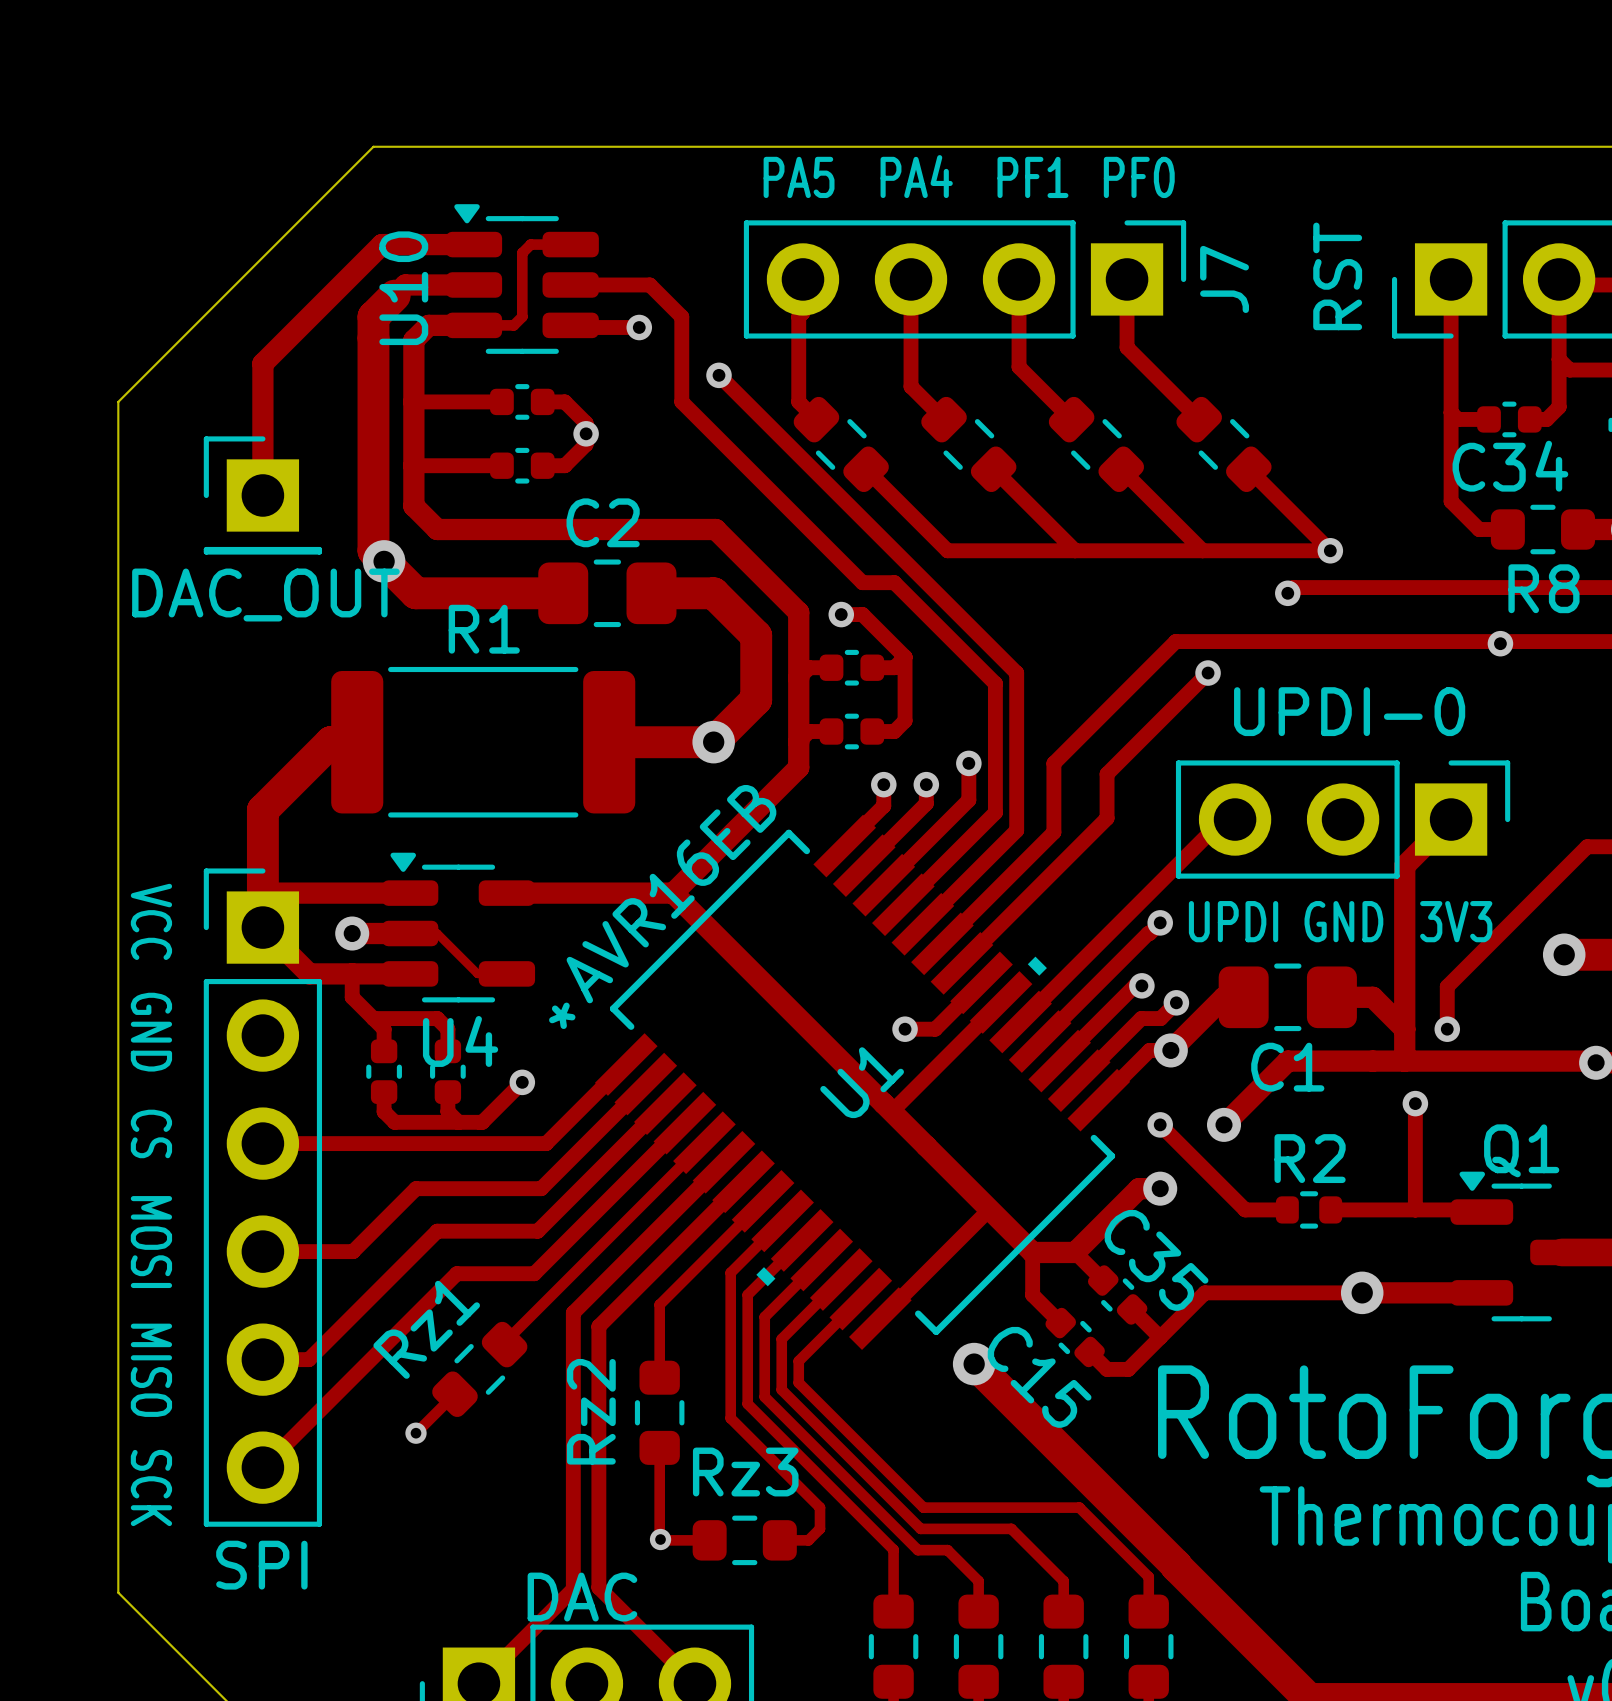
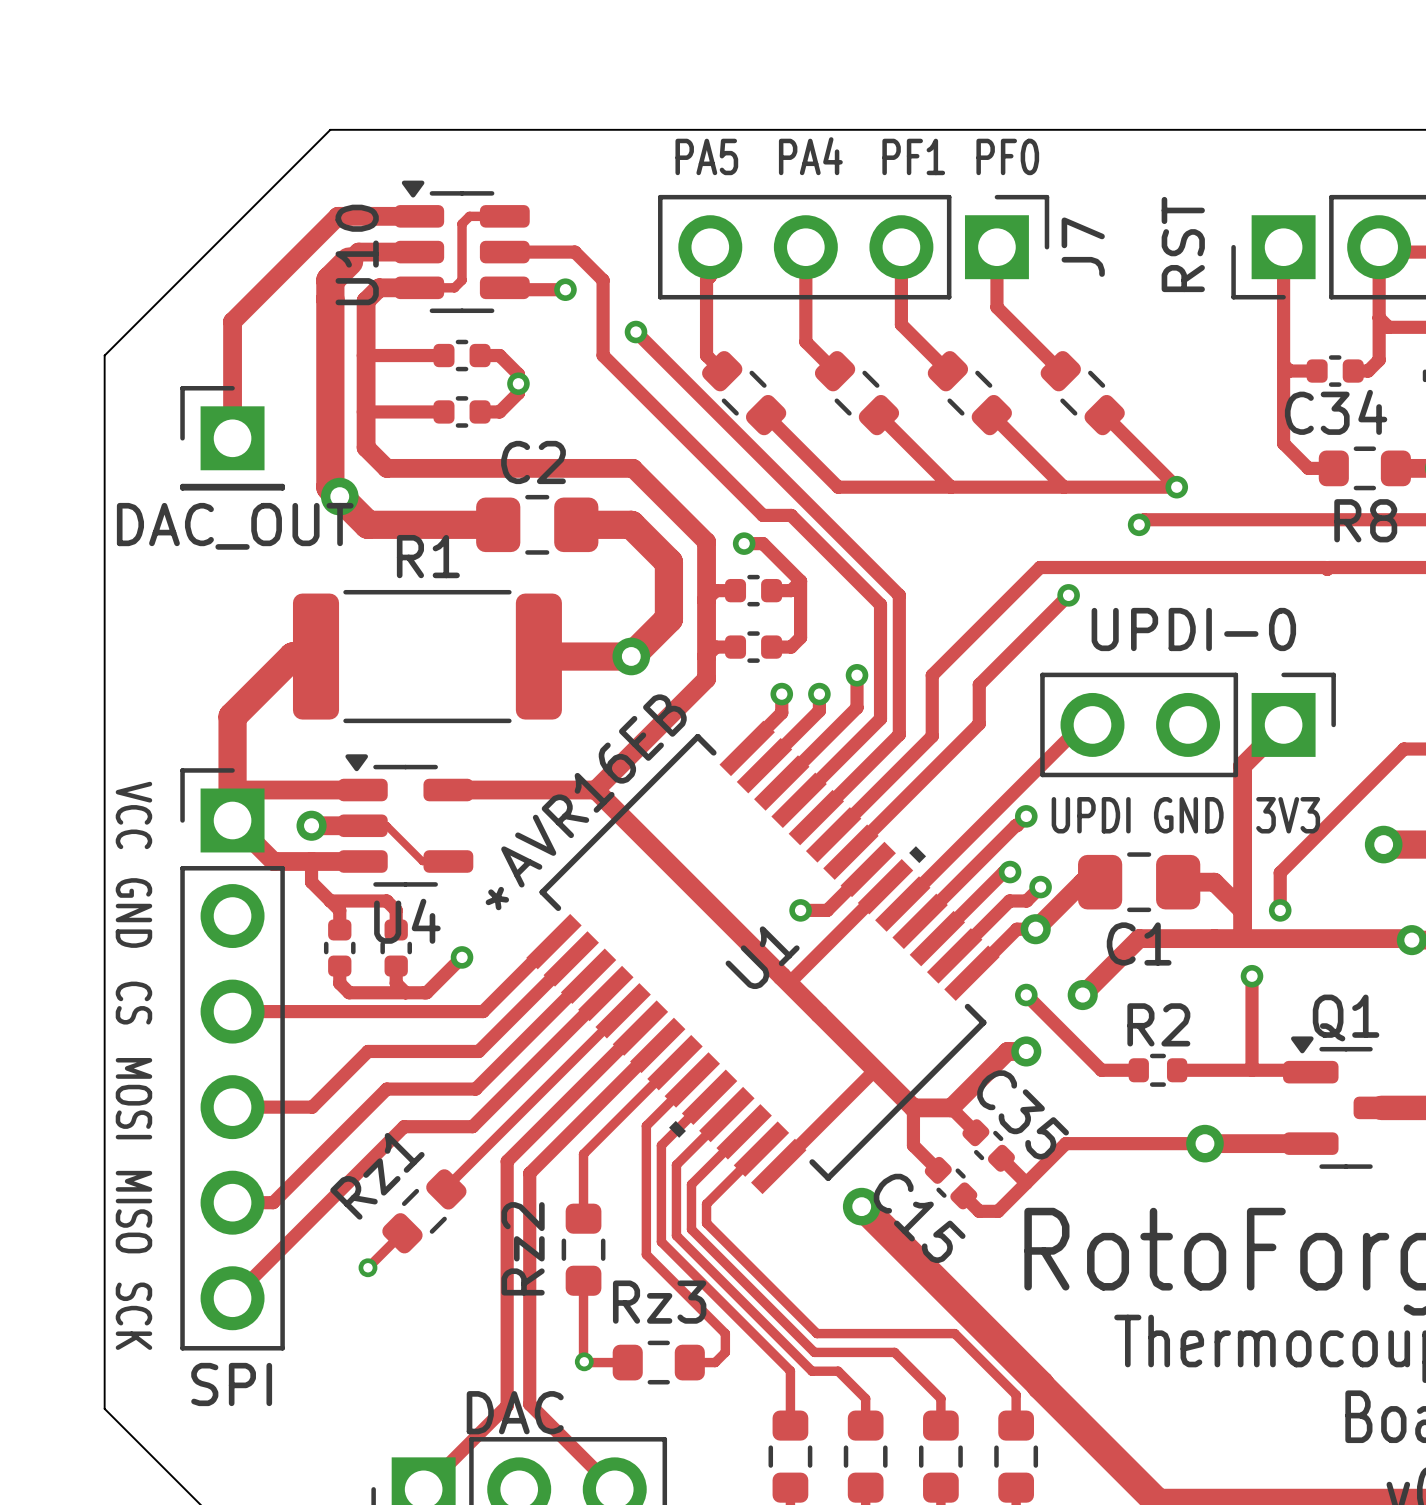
via: (1500, 643) -> none

